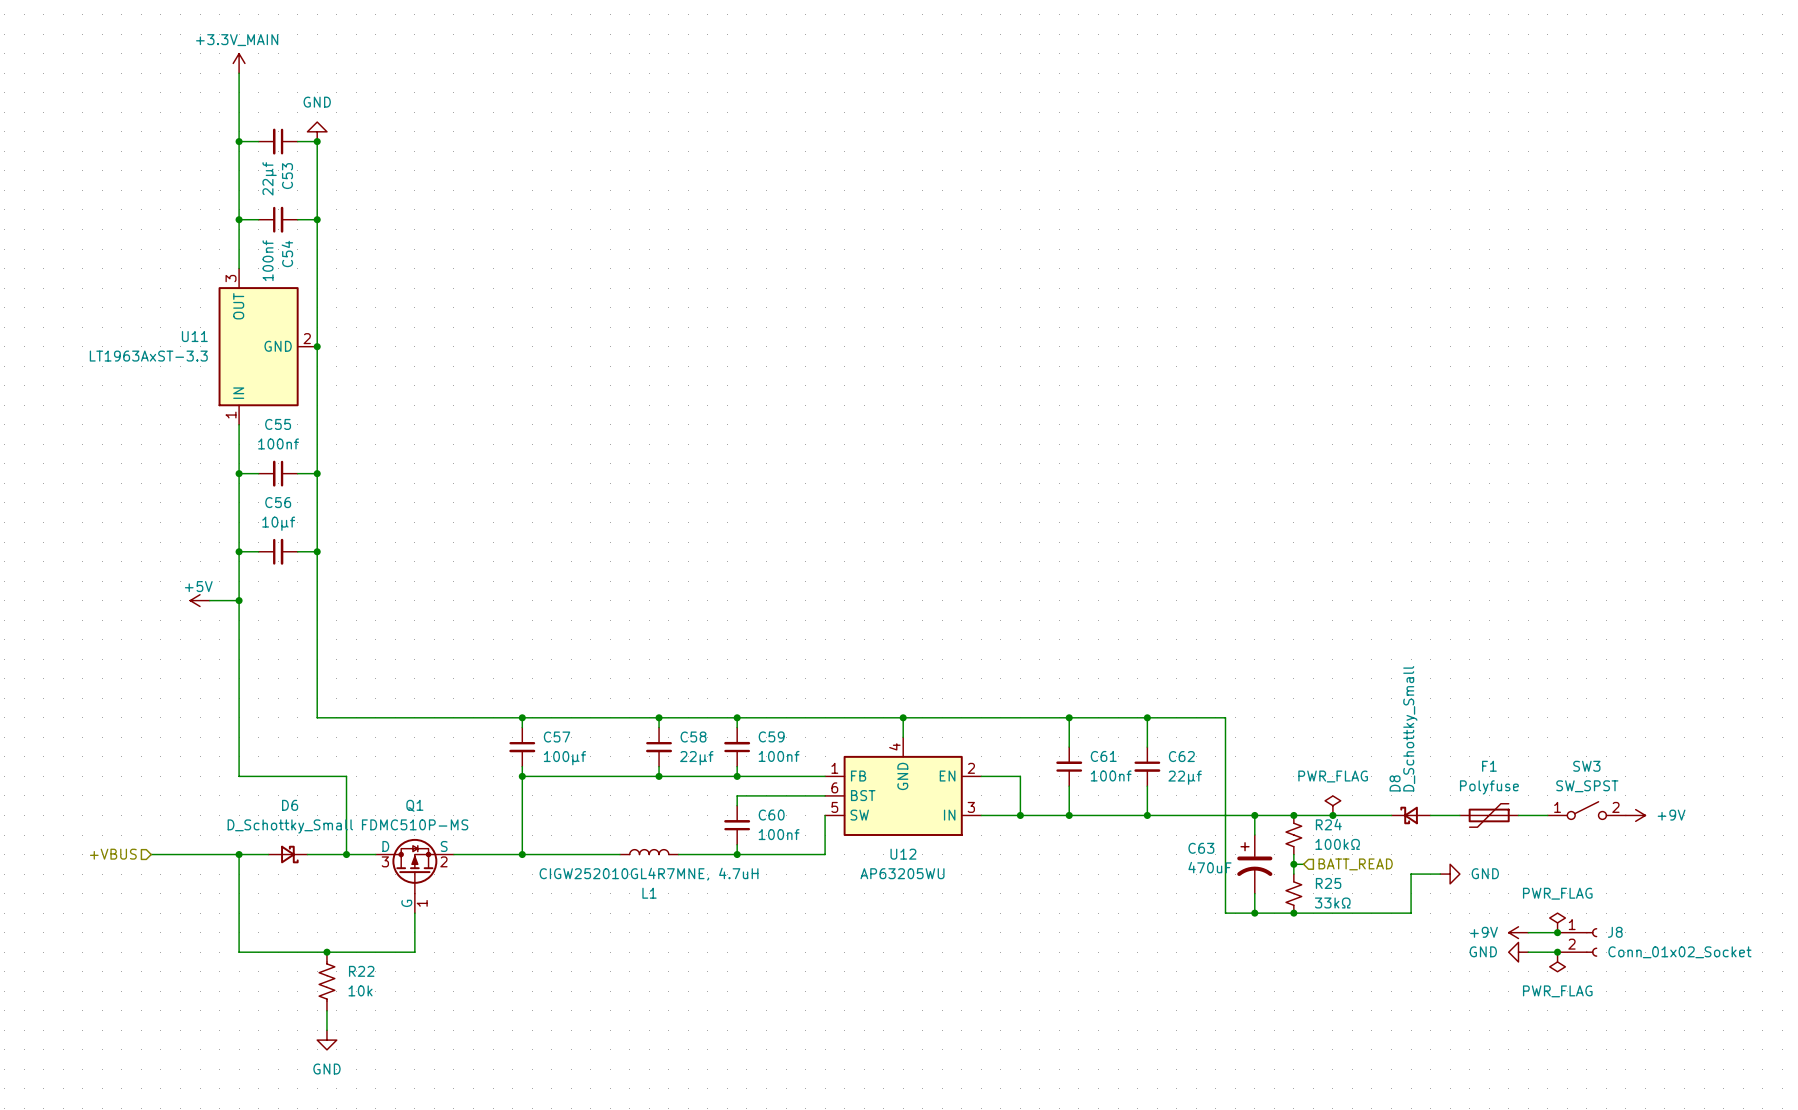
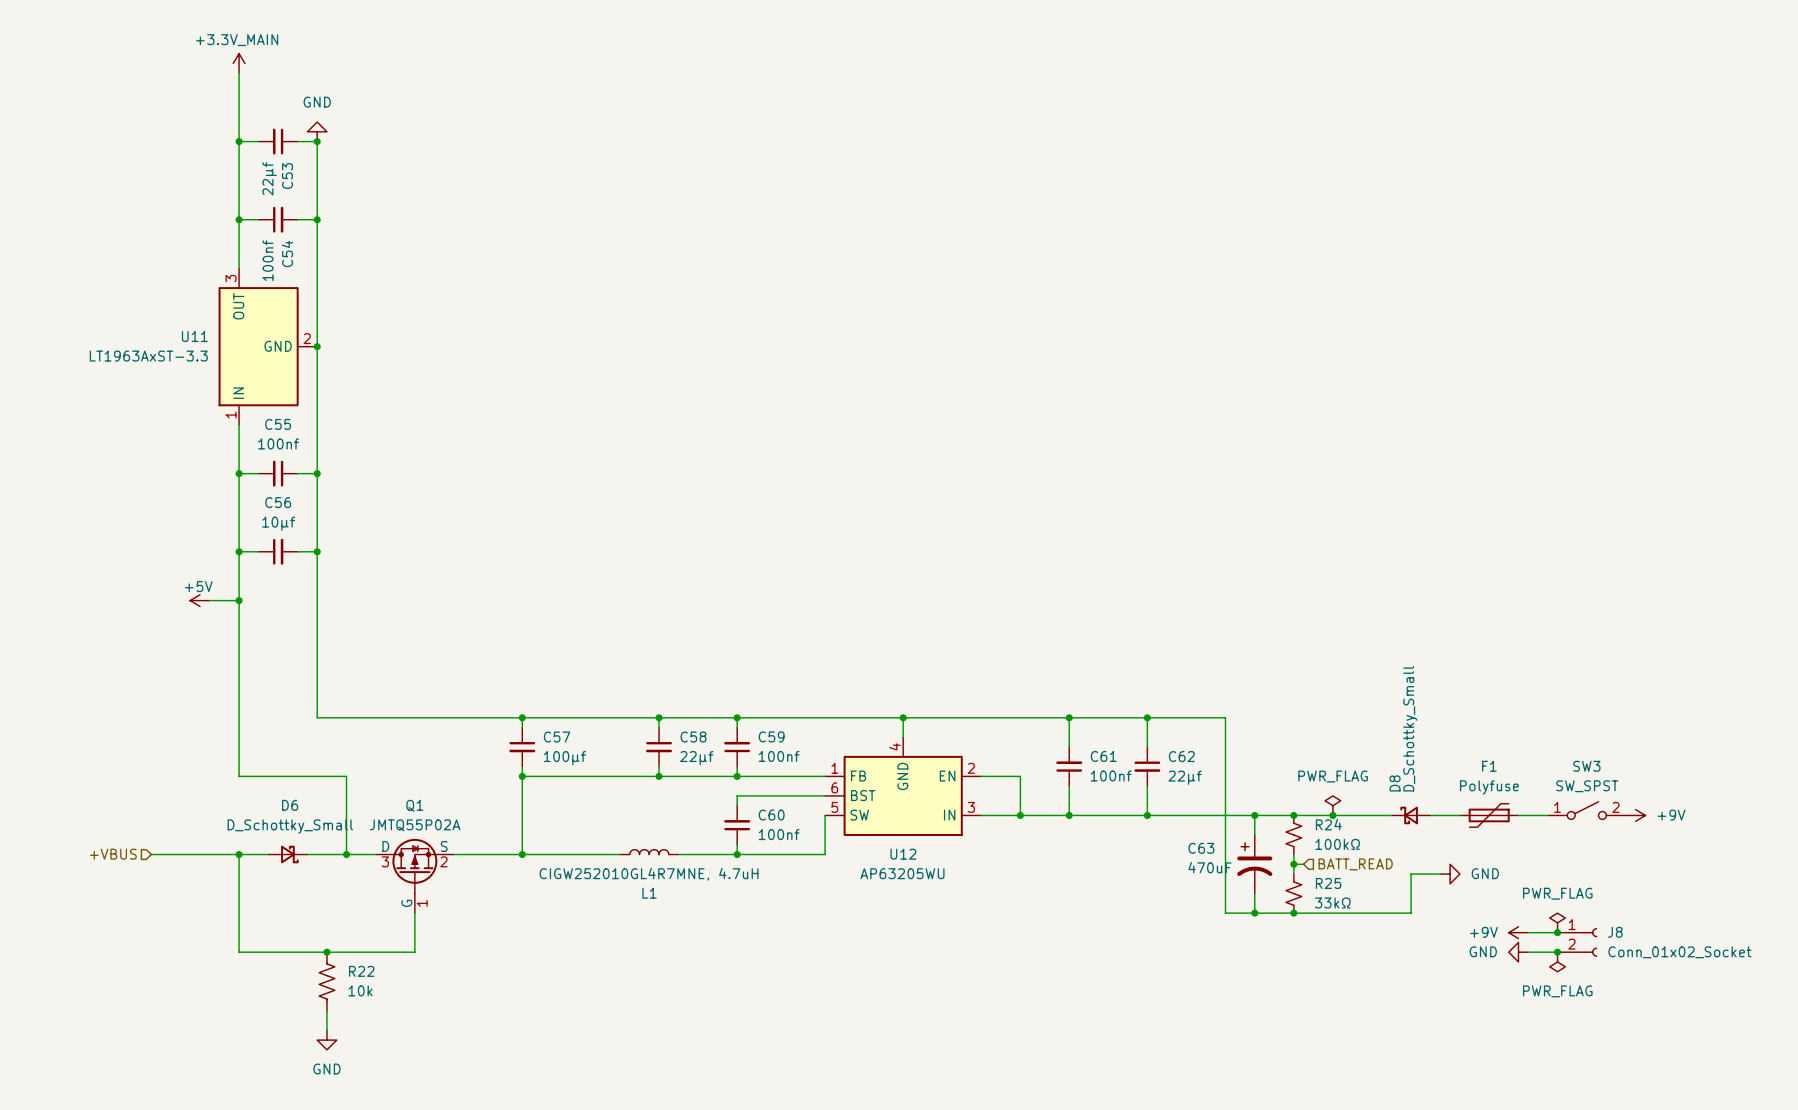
Q1 value: FDMC510P-MS (415, 824) -> JMTQ55P02A (415, 825)

